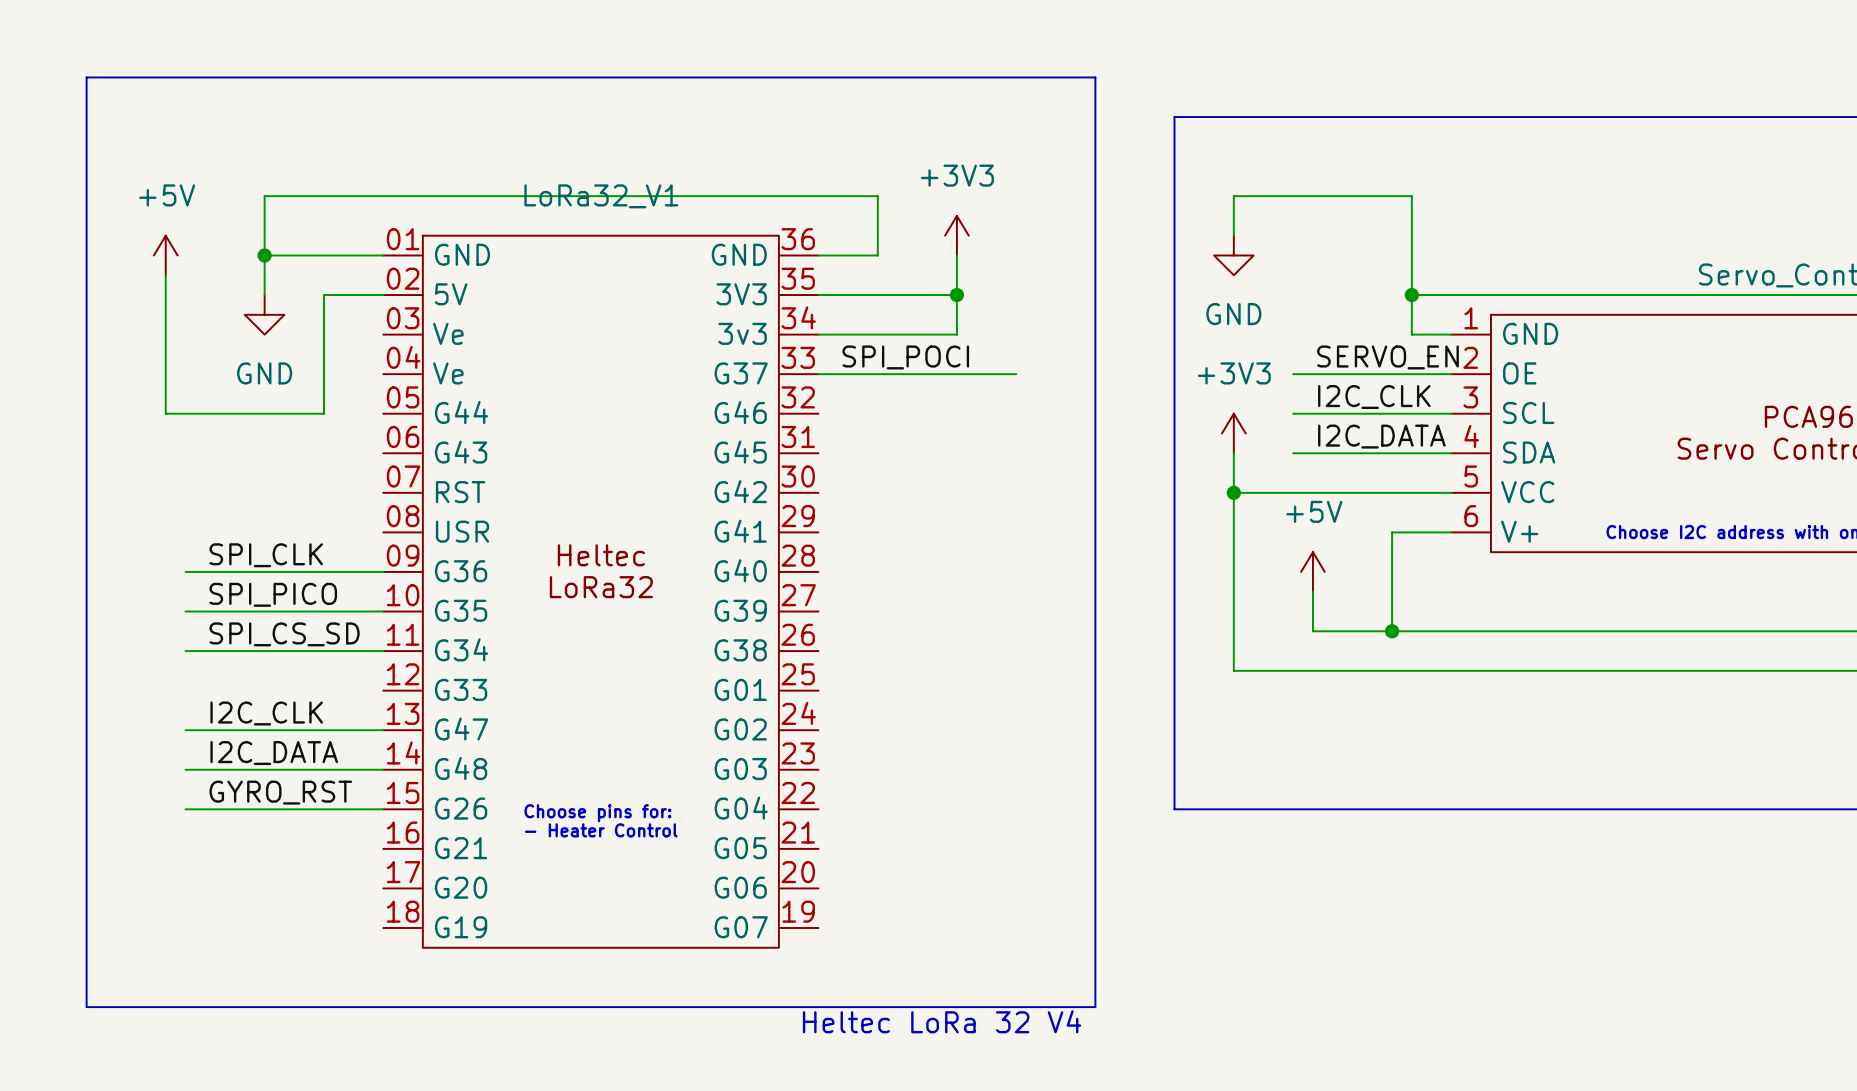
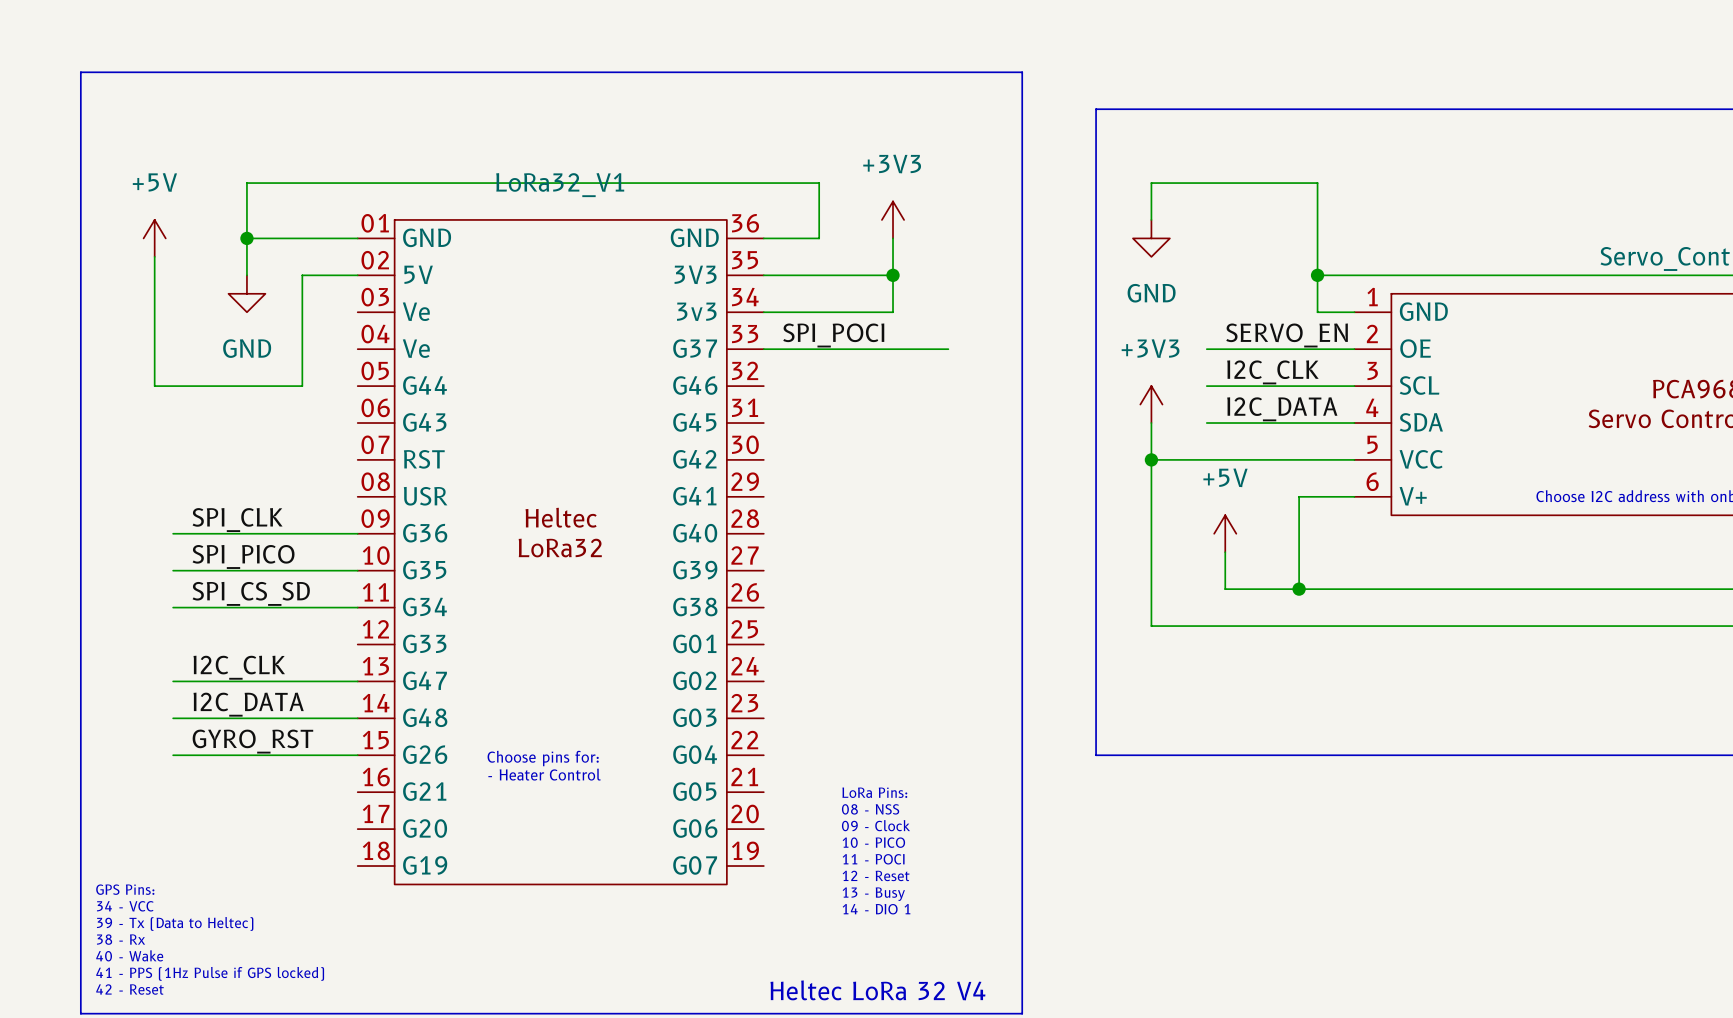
text: none -> LoRa Pins: (874, 792)
text: none -> 08 - NSS (870, 809)
text: none -> 09 - Clock (875, 825)
text: none -> 10 - PICO (873, 842)
text: none -> 11 - POCI (873, 859)
text: none -> 12 - Reset (876, 875)
text: none -> GPS Pins: (125, 889)
text: none -> 13 - Busy (873, 894)
text: none -> 34 - VCC (125, 906)
text: none -> 14 - DIO 1 (876, 909)
text: none -> 39 - Tx (Data to Heltec) (175, 923)
text: none -> 38 - Rx (121, 939)
line: (86, 1007) (1095, 1007) -> (80, 939) (80, 1013) (1022, 1013) (1022, 939)
text position: Heltec LoRa 32 V4 (942, 1021) -> Heltec LoRa 32 V4 (877, 990)
text: none -> 40 - Wake (129, 955)
text: none -> 41 - PPS (1Hz Pulse if GPS locked) (210, 973)
text: none -> 42 - Reset (130, 989)

